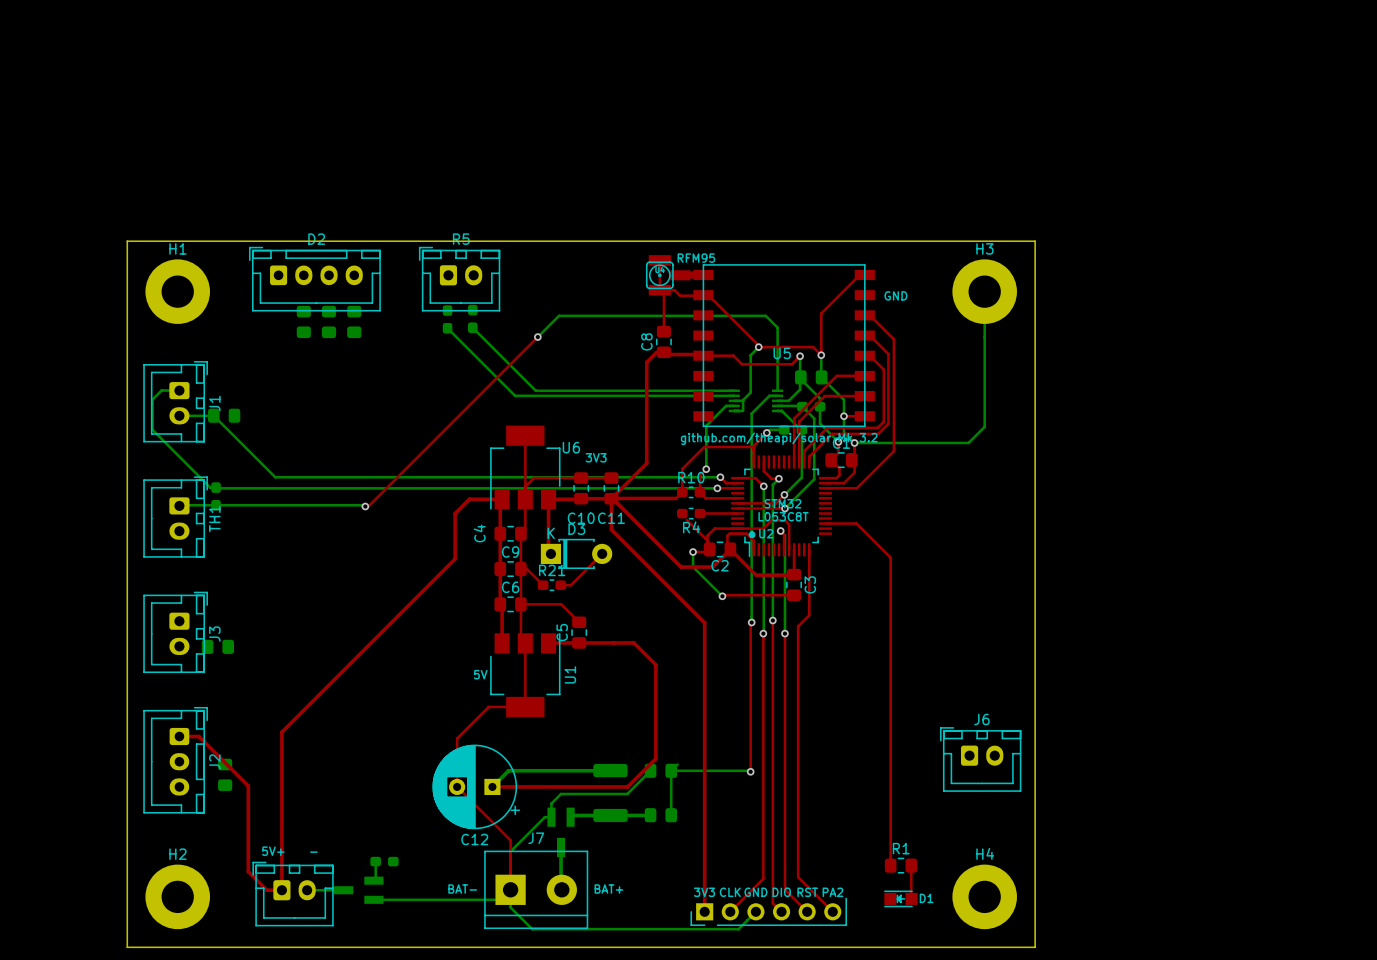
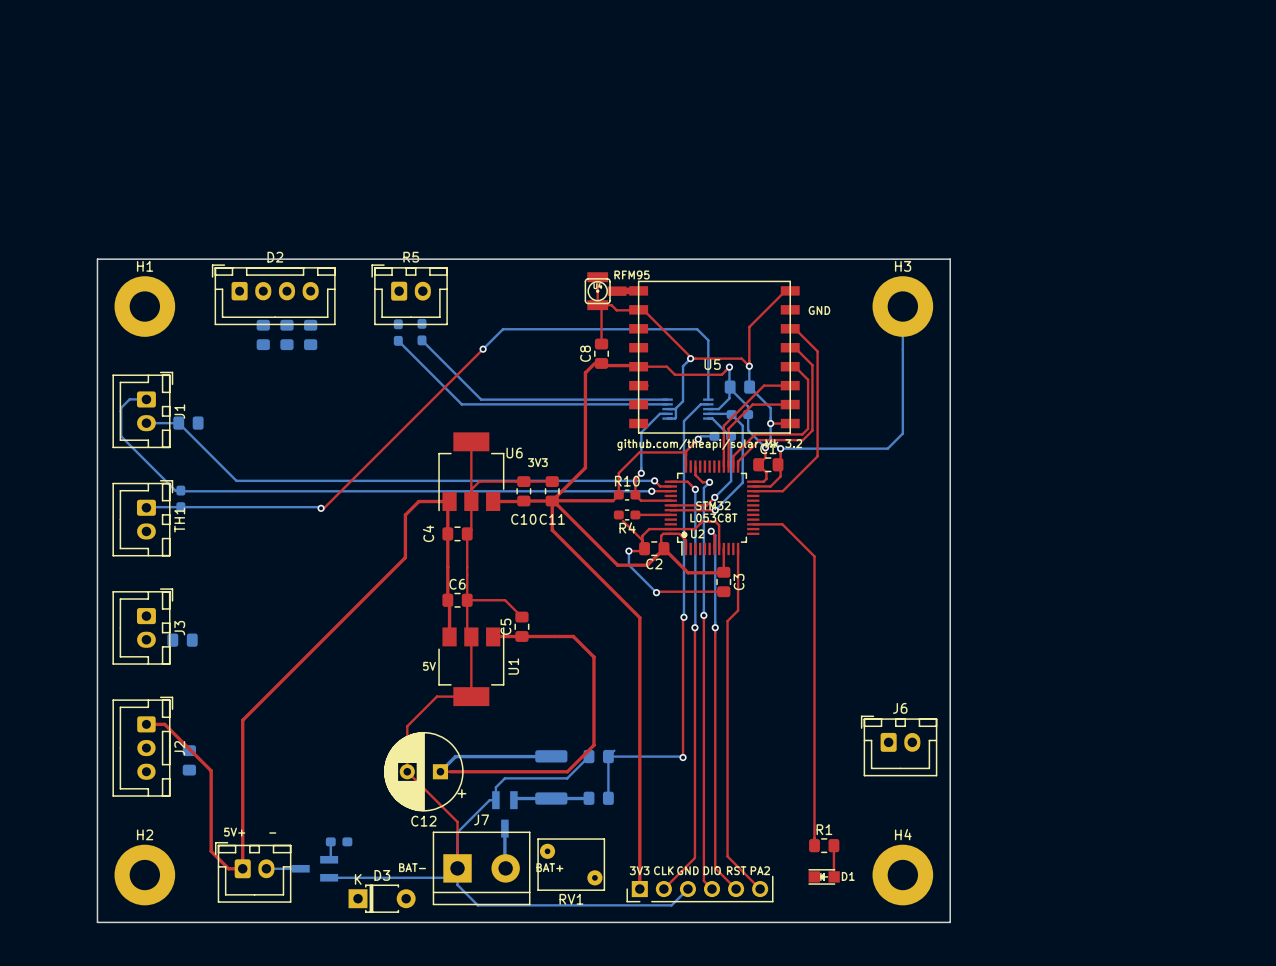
top track: (548, 499) (548, 551) (550, 553) -> none
D3 position: (576, 553) -> (382, 898)
top track: (602, 553) (570, 585) (560, 585) -> none
C9: (510, 569) -> none
top track: (520, 569) (526, 569) (543, 585) -> none
R21: (551, 585) -> none
RV1: none -> (571, 864)

